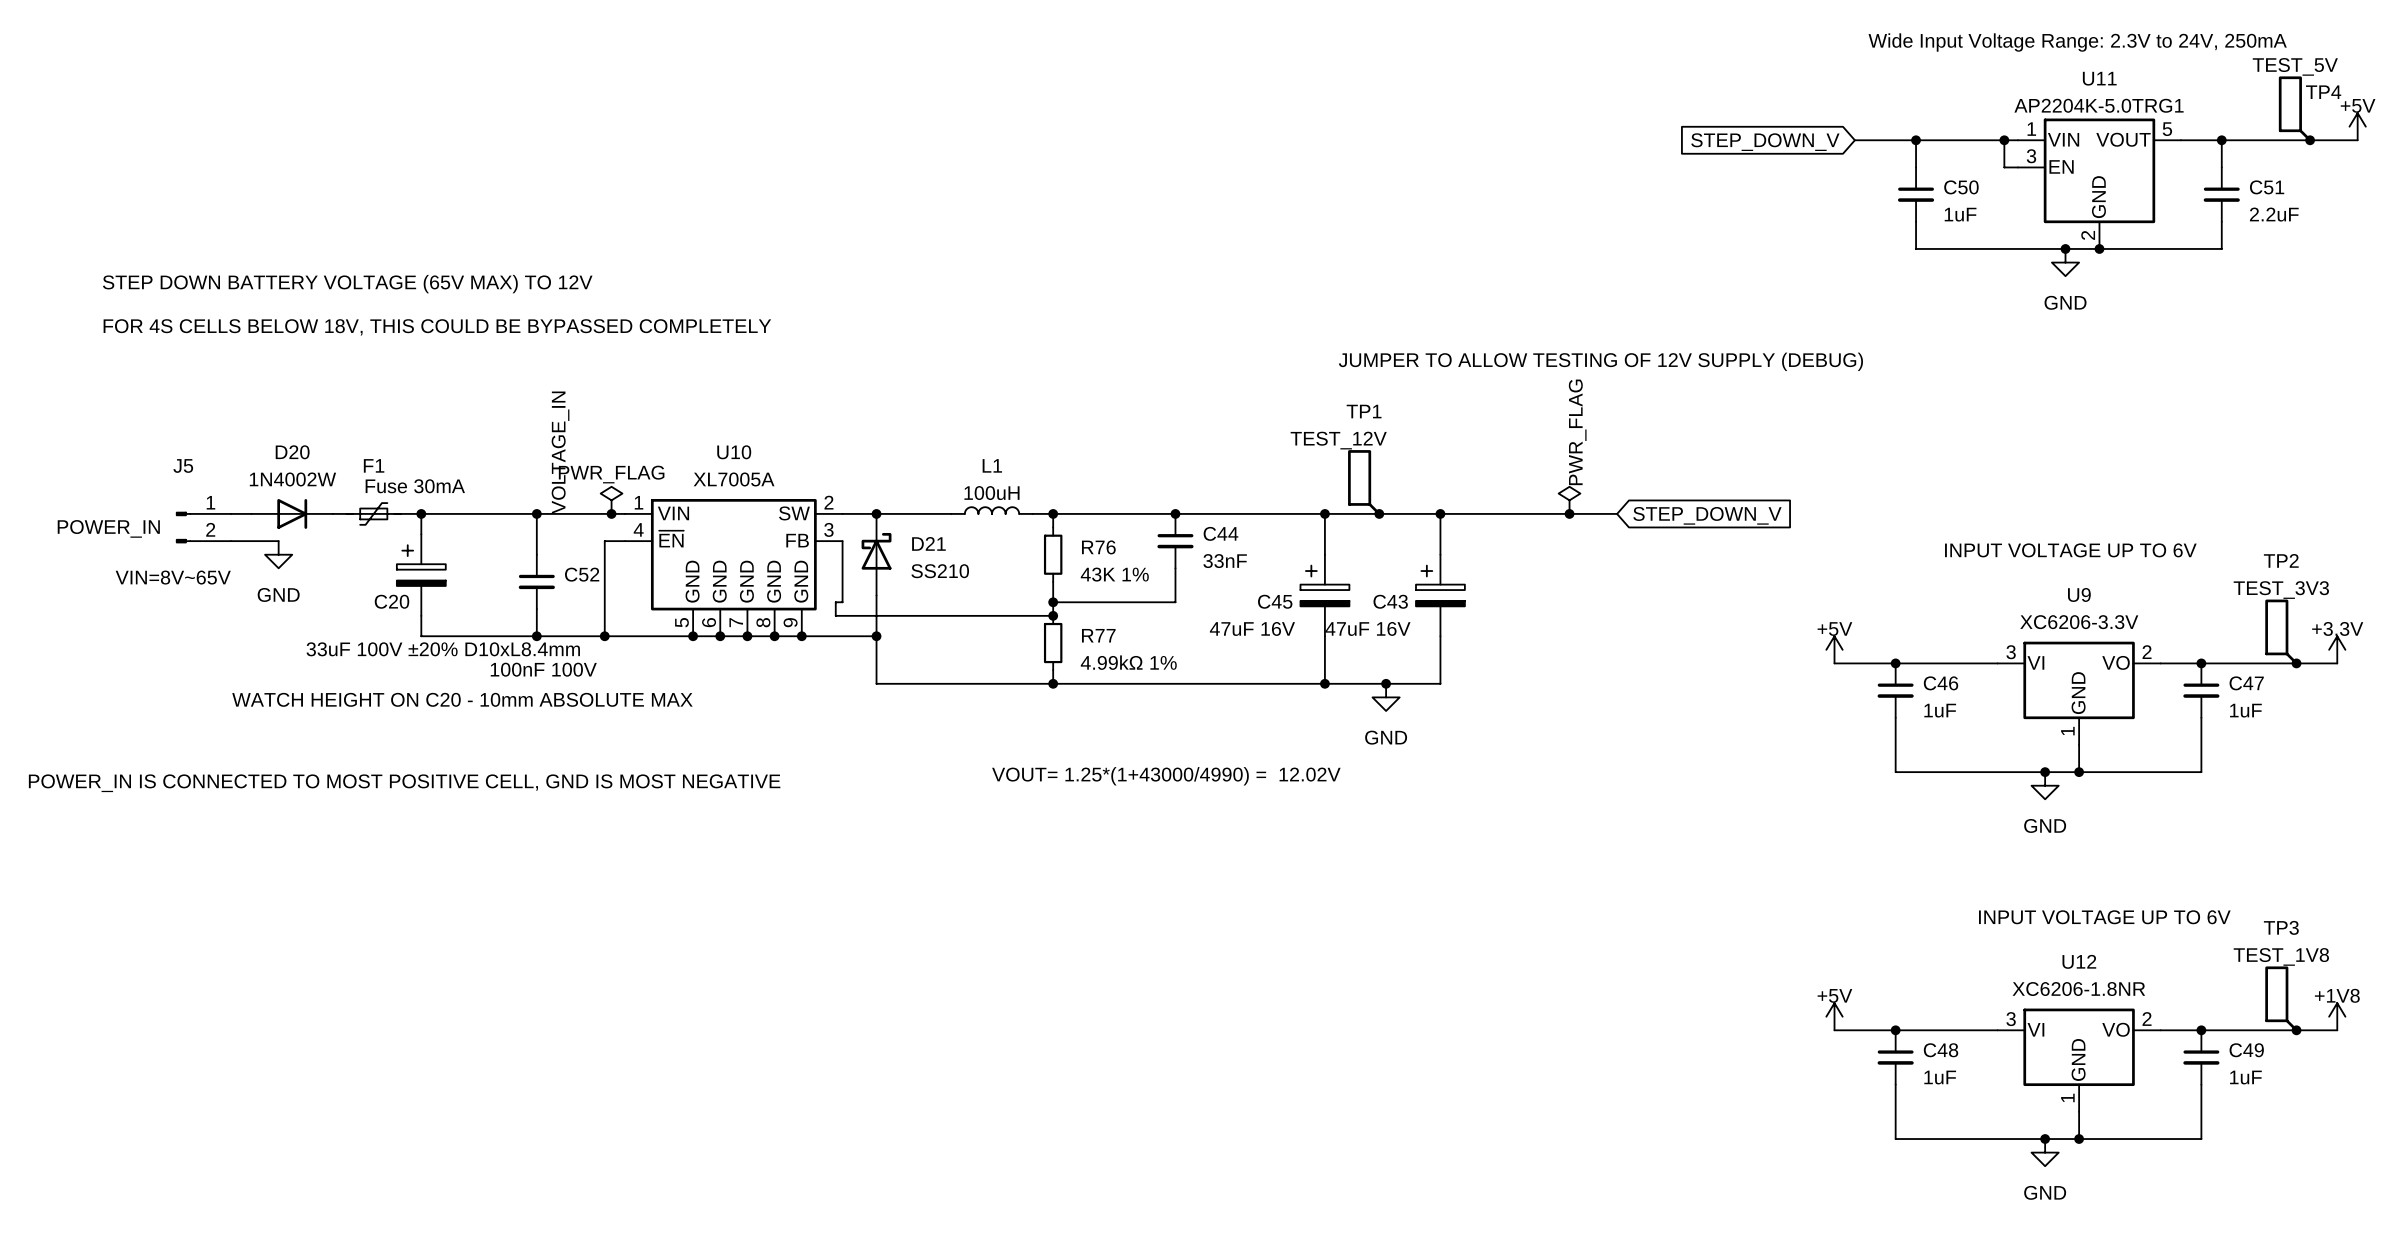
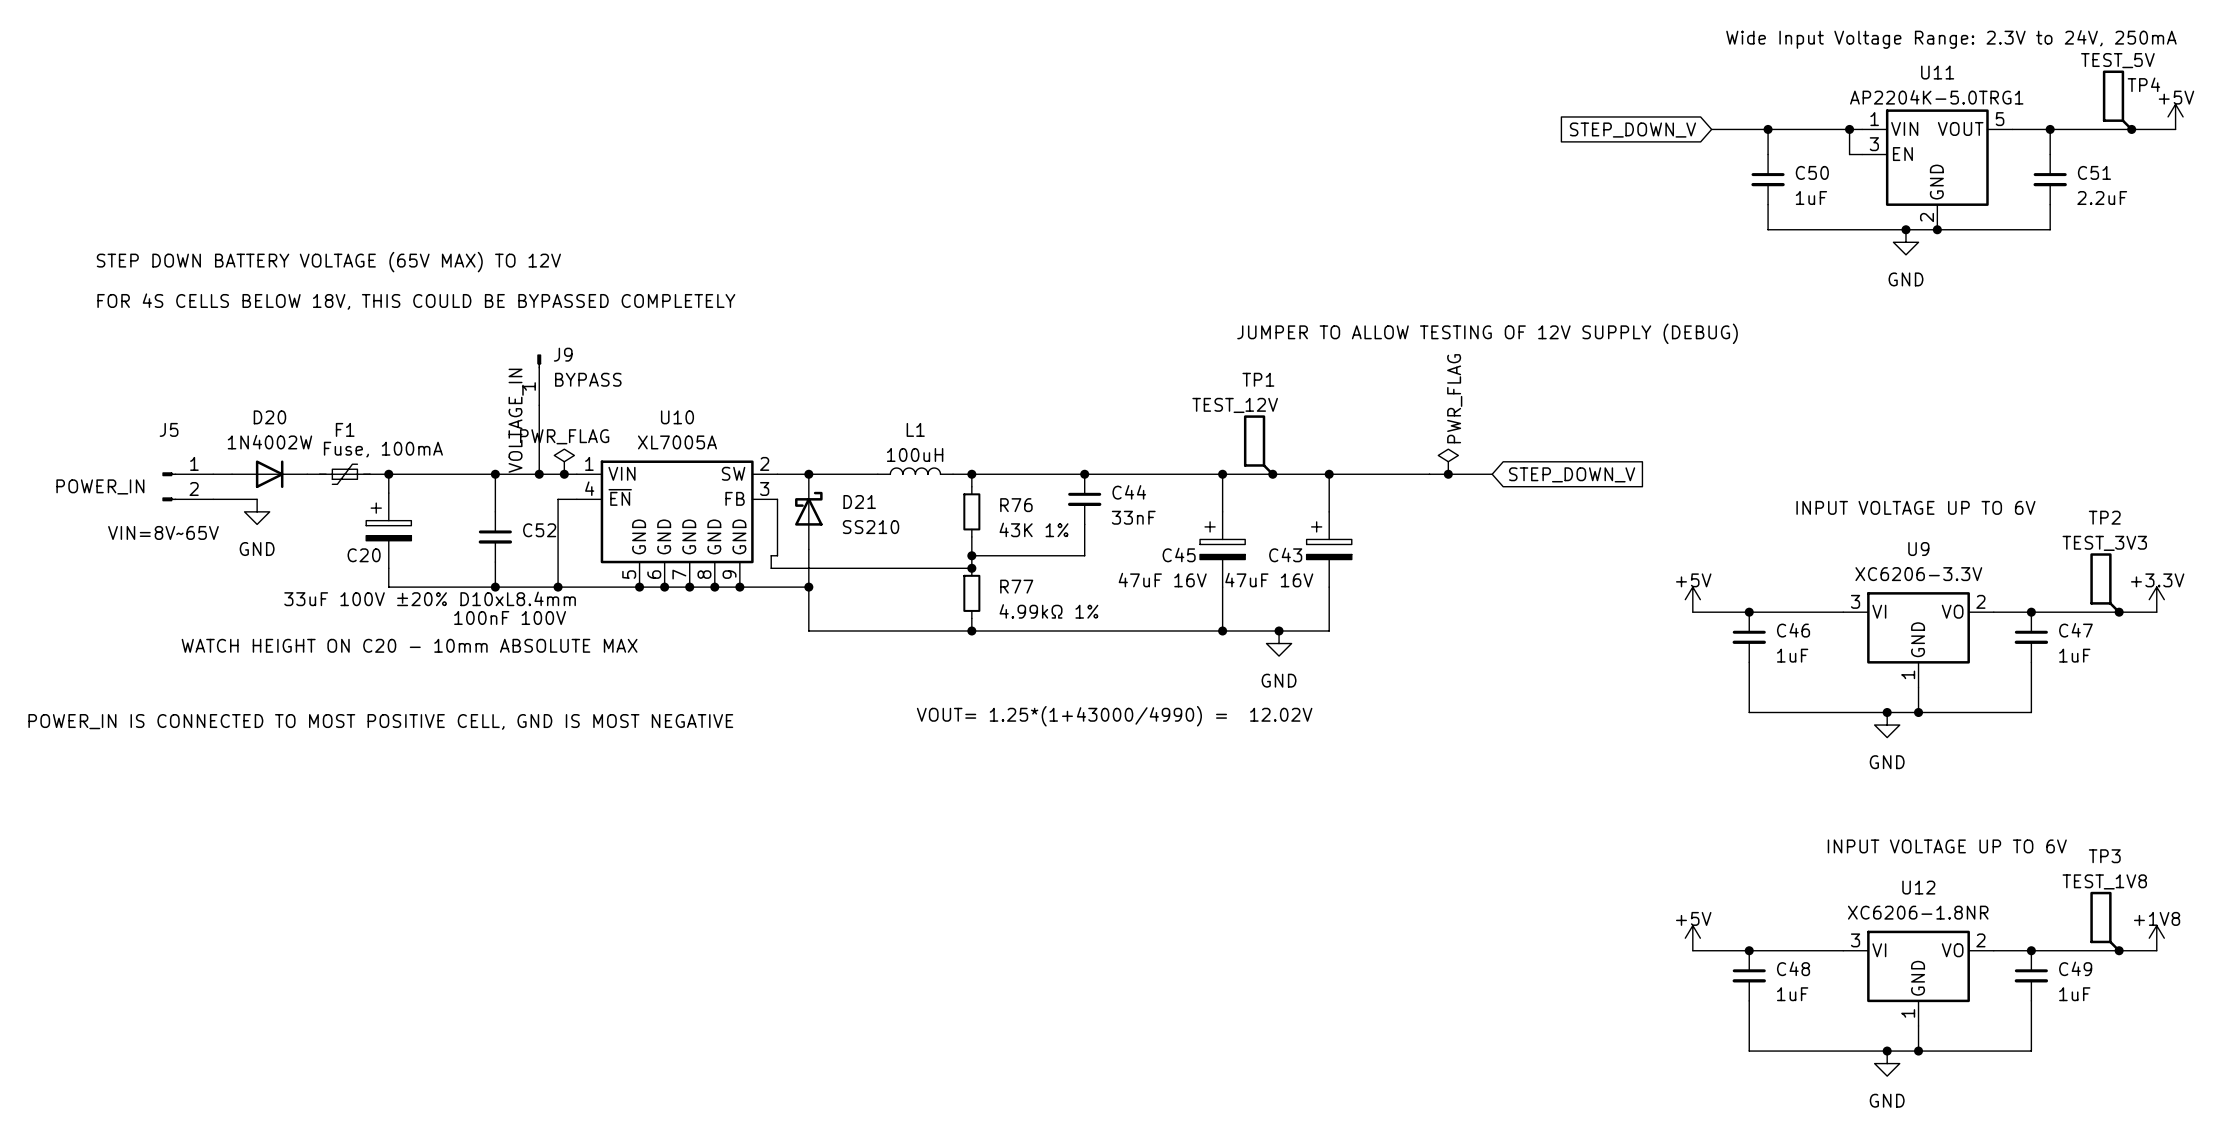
J9: none -> BYPASS (539, 379)
wire: none -> (539, 405) (539, 474)
F1 value: Fuse 30mA (415, 486) -> Fuse, 100mA (383, 449)
junction: none -> (539, 474)

